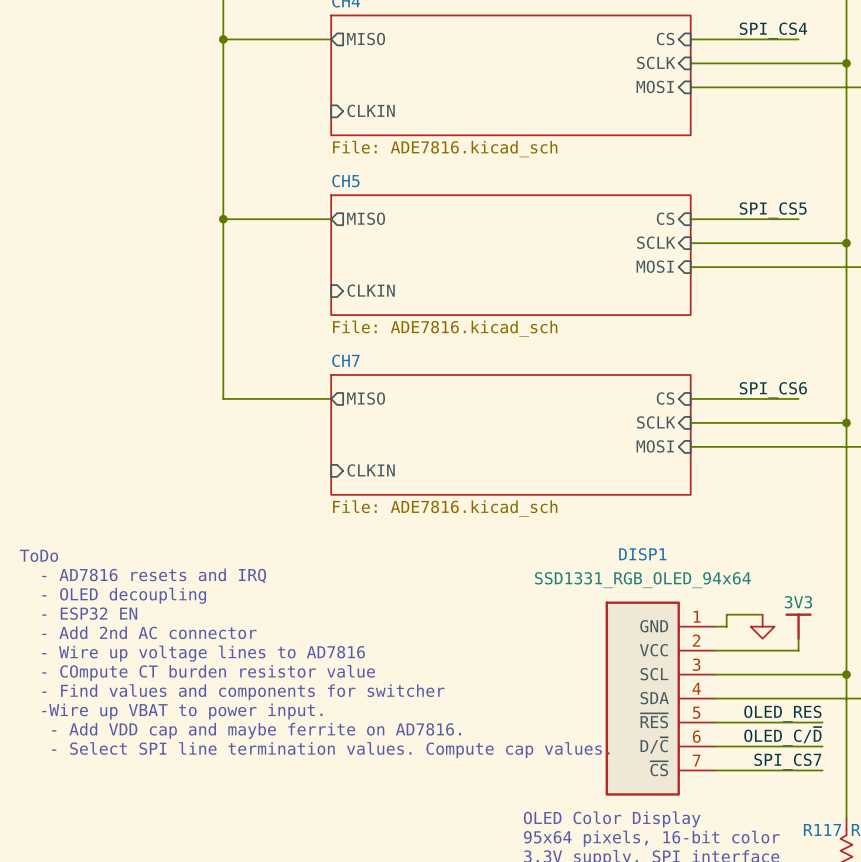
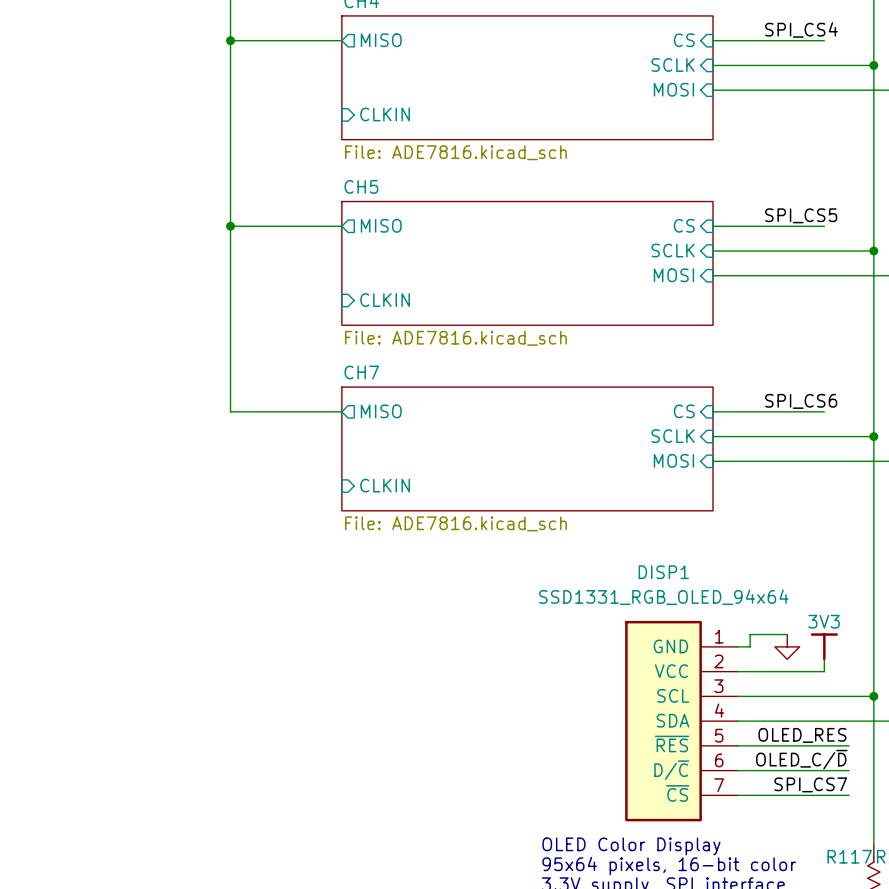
text: ToDo (39, 555) -> none
text: - AD7816 resets and IRQ (154, 575) -> none
text: - OLED decoupling (124, 595) -> none
text: - ESP32 EN (89, 613) -> none
text: - Add 2nd AC connector (149, 632) -> none
text: - Wire up voltage lines to AD7816 (203, 653) -> none
text: - COmpute CT burden resistor value (208, 672) -> none
text: - Find values and components for switcher (243, 692) -> none
text: -Wire up VBAT to power input. (182, 711) -> none
text: - Add VDD cap and maybe ferrite on AD7816. (256, 730) -> none
text: - Select SPI line termination values. Compute cap values. (330, 750) -> none

